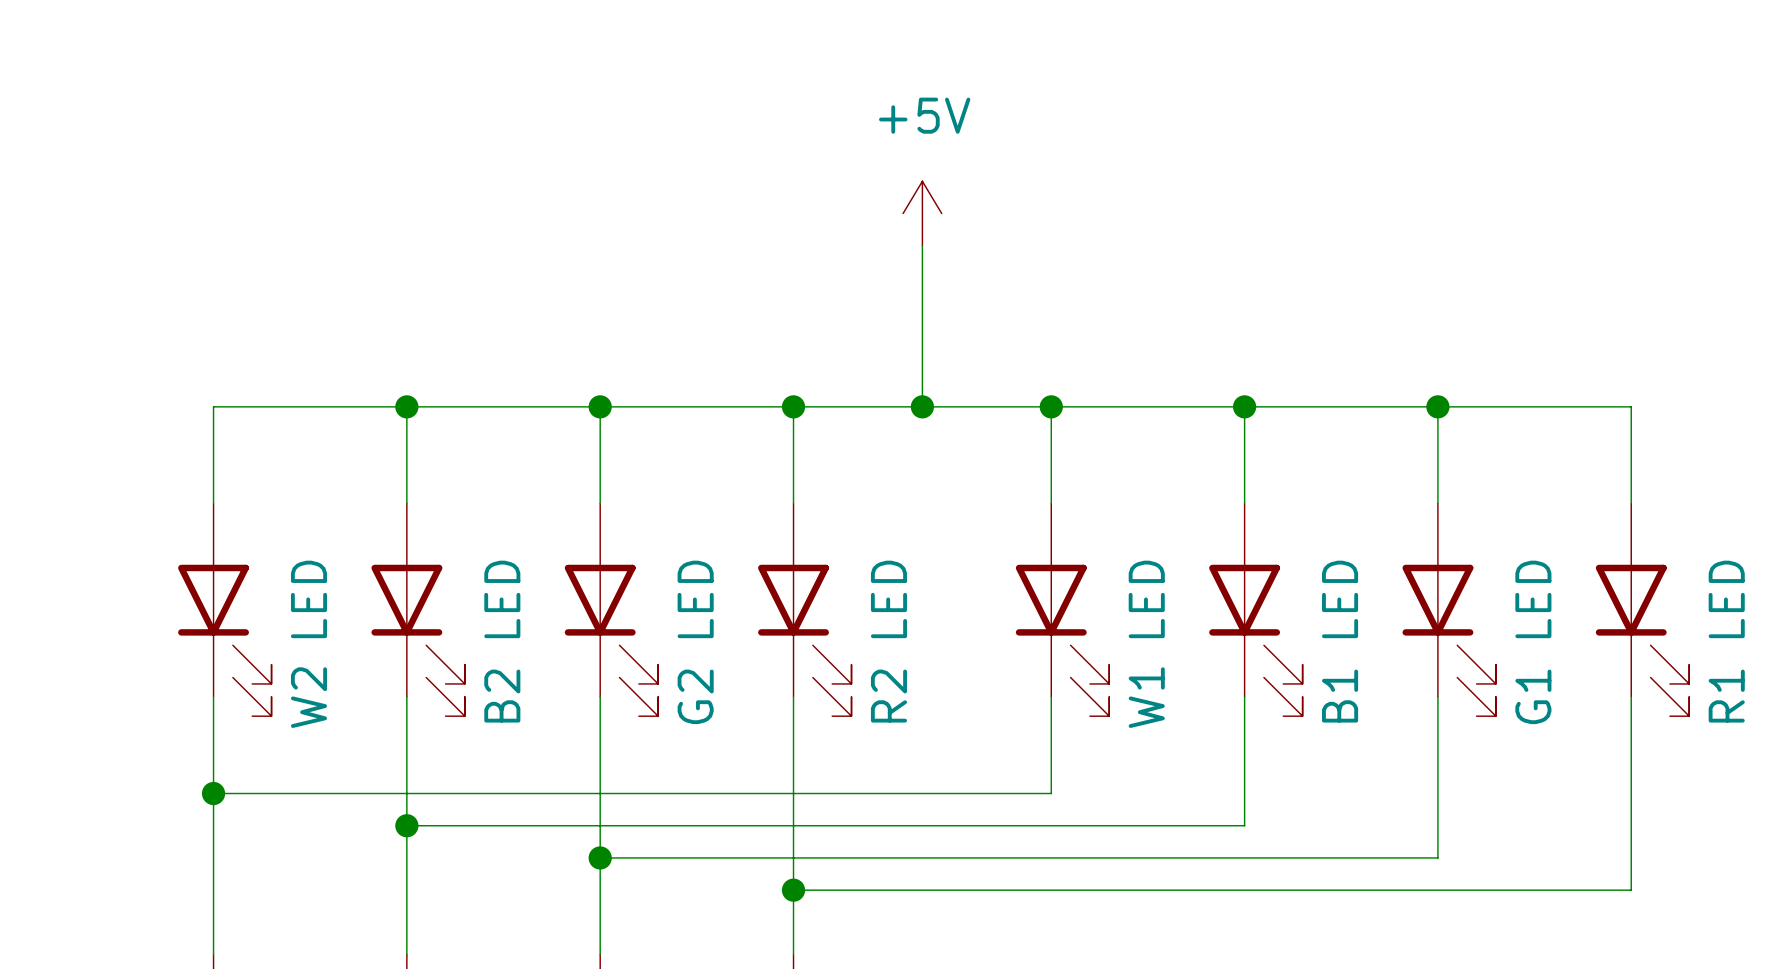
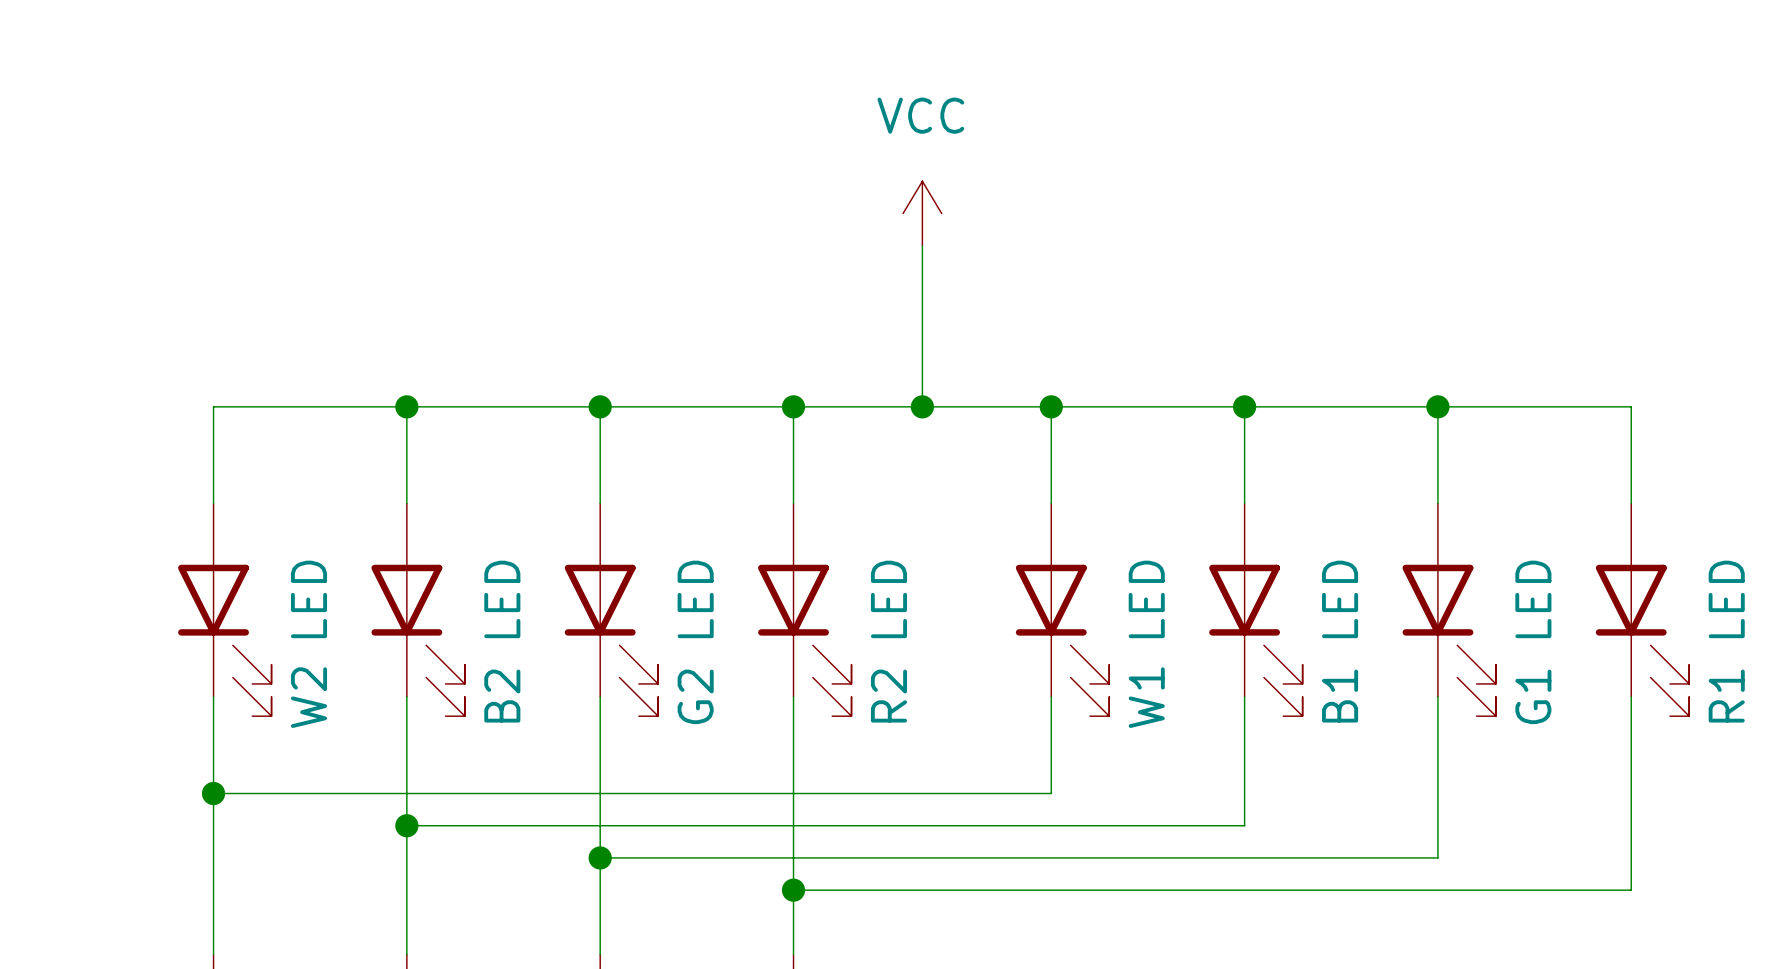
power symbol: +5V (922, 213) -> VCC (922, 213)

